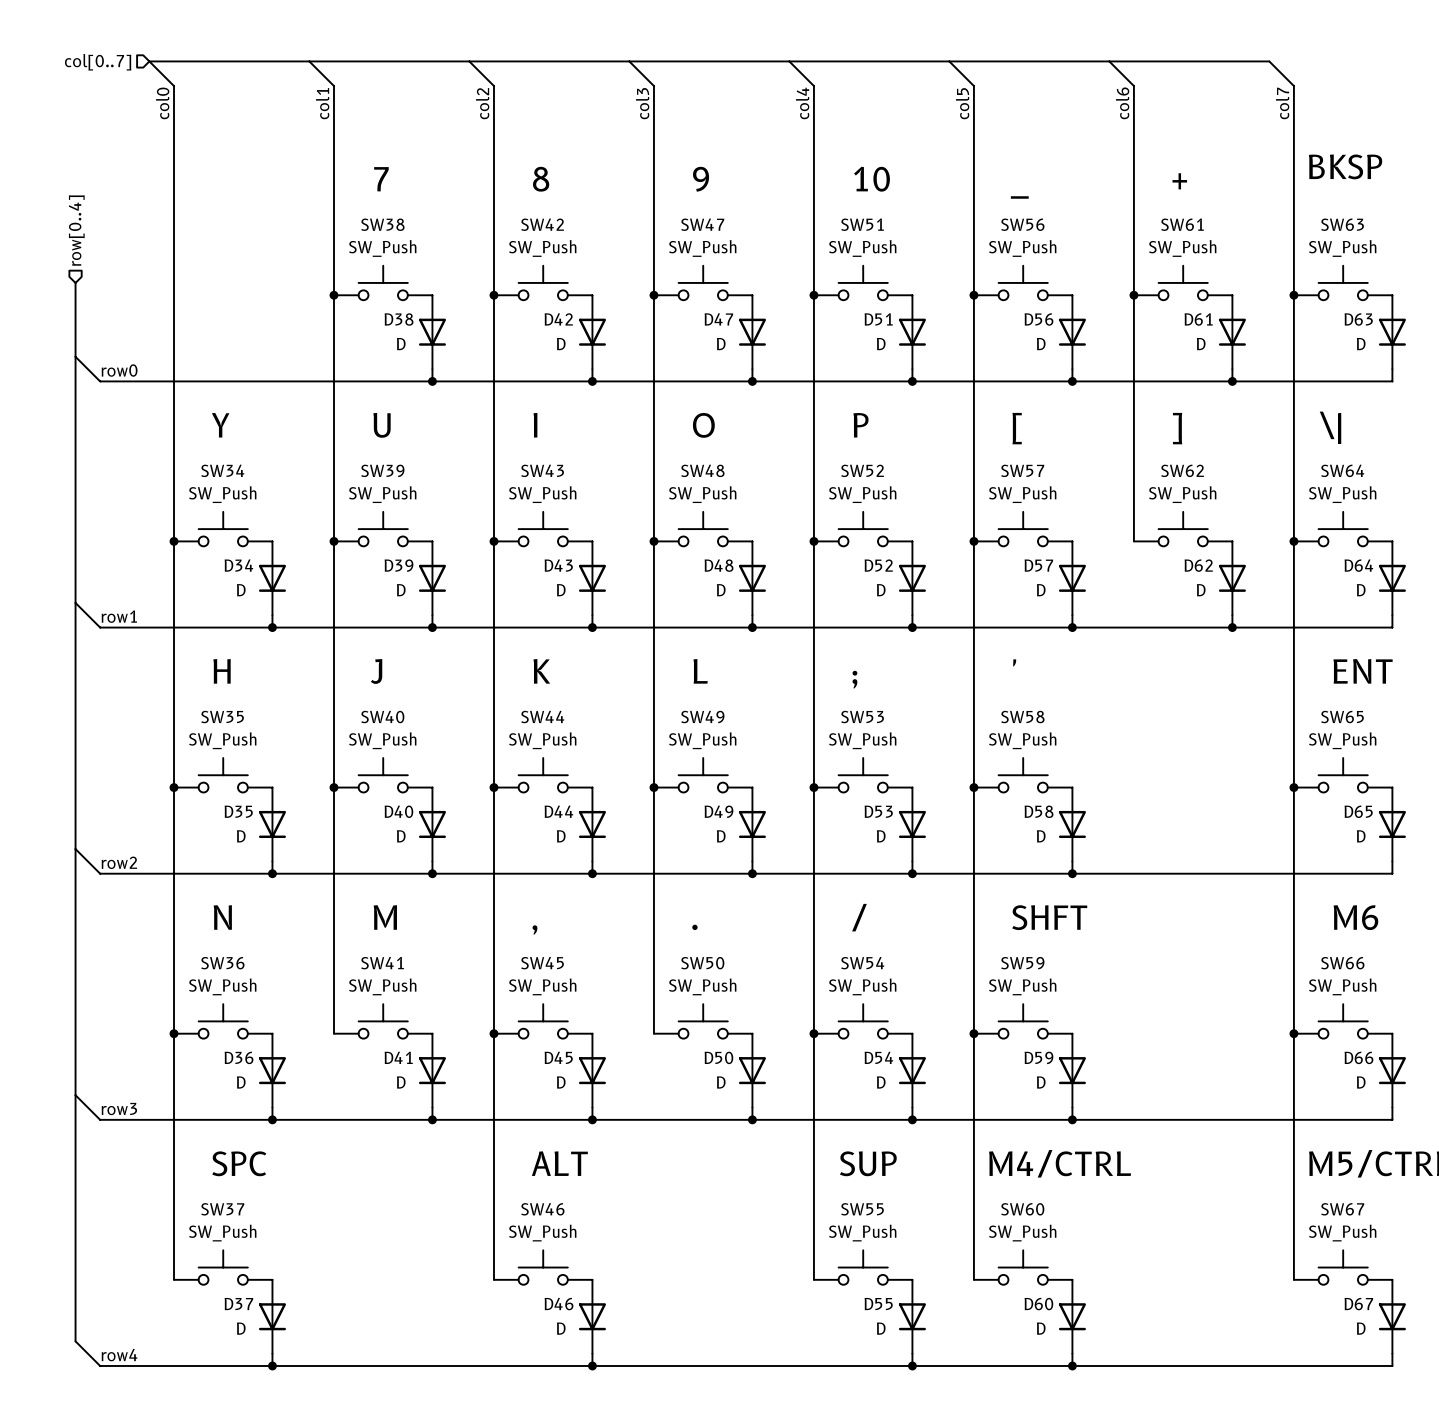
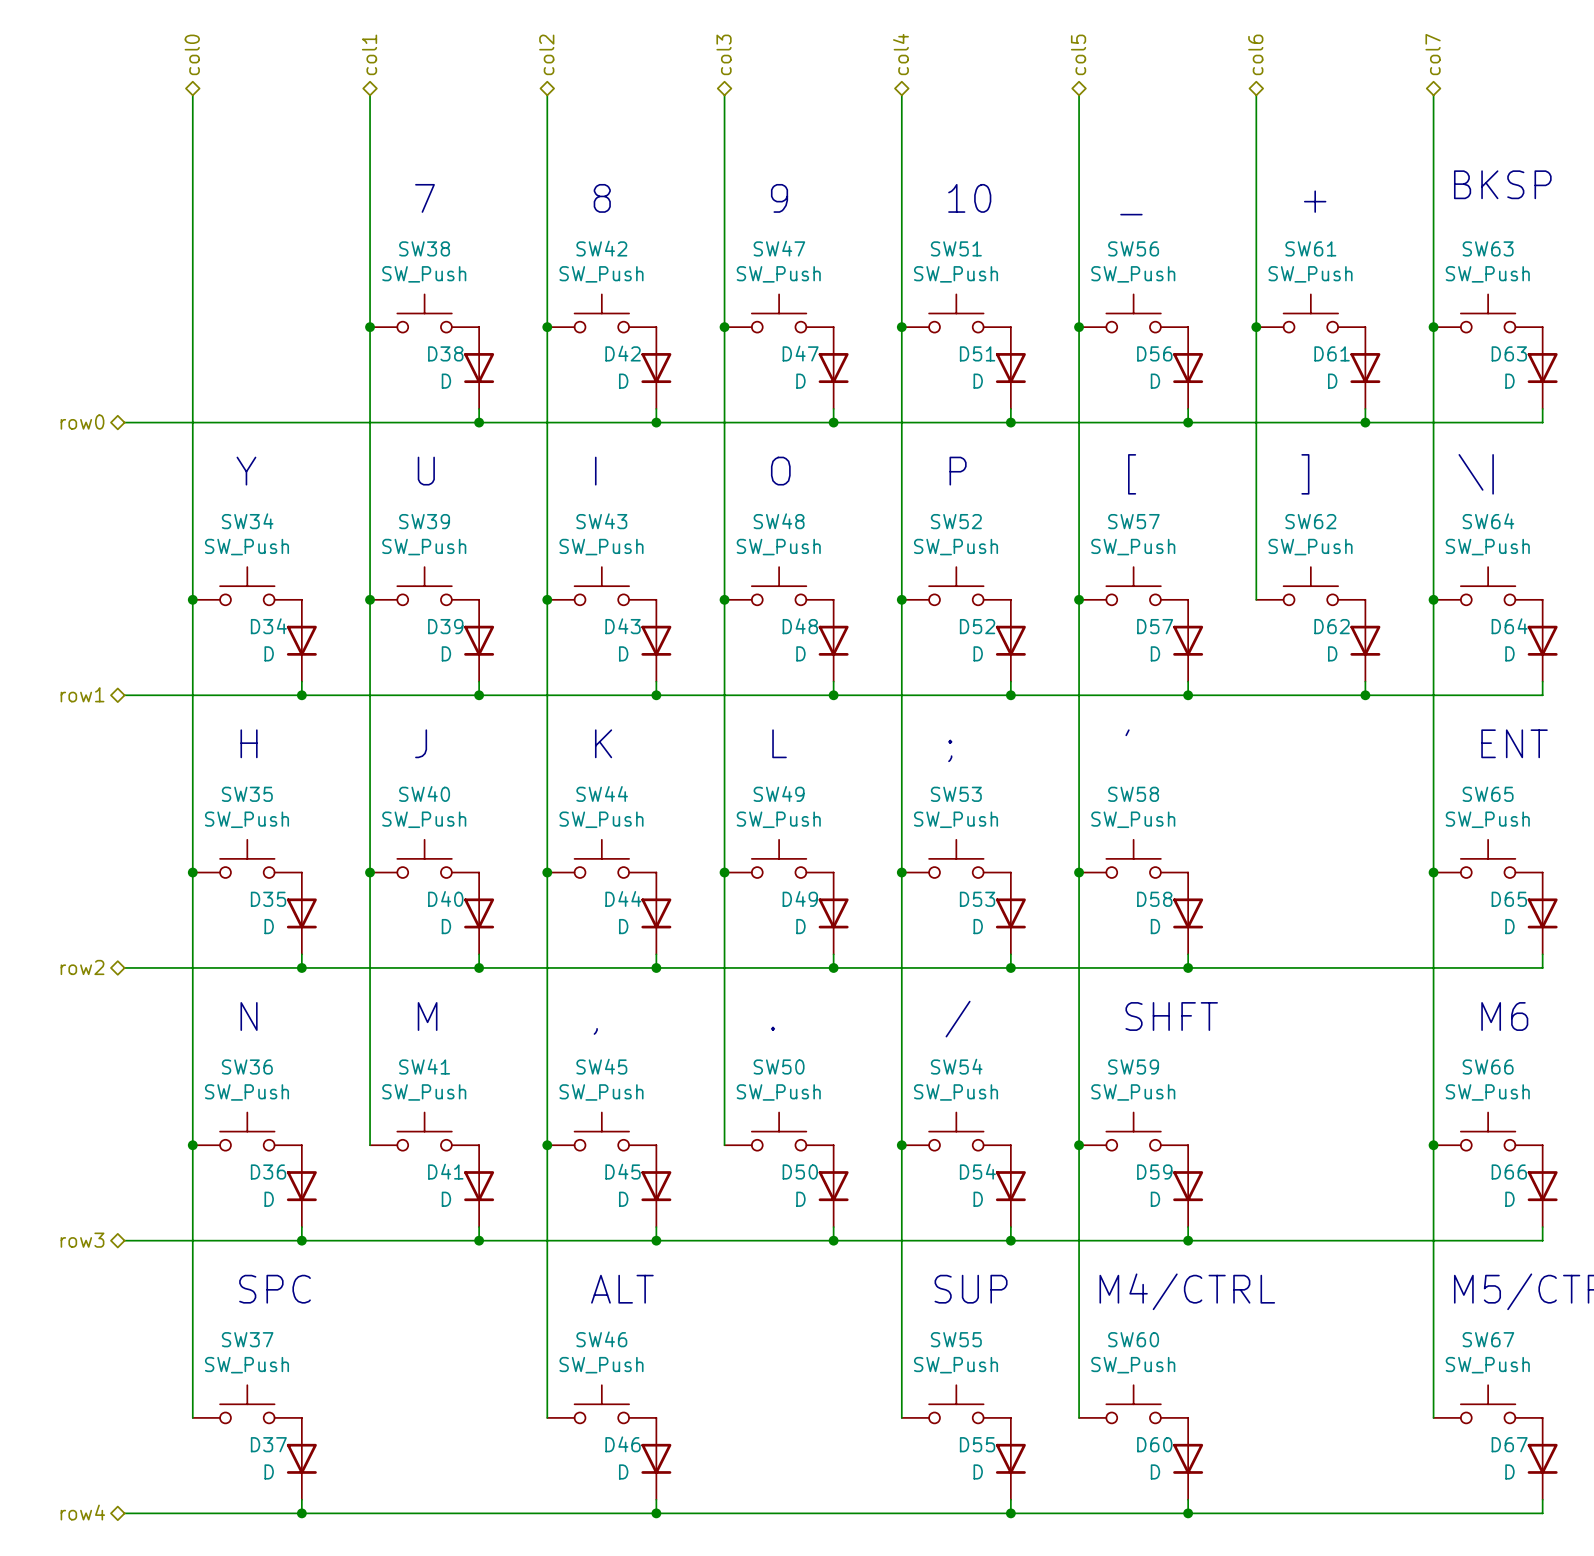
hierarchical label: none -> col0 (192, 54)
hierarchical label: none -> col3 (724, 54)
hierarchical label: none -> col4 (900, 54)
hierarchical label: none -> col6 (1255, 54)
hierarchical label: none -> col7 (1433, 54)
hierarchical label: none -> col1 (369, 54)
hierarchical label: none -> col2 (546, 54)
hierarchical label: none -> col5 (1078, 54)
wire: (149, 61) (174, 86) -> none
bus: (149, 61) (1269, 61) -> none
wire: (309, 61) (333, 86) -> none
wire: (469, 61) (493, 86) -> none
wire: (629, 61) (653, 86) -> none
wire: (789, 61) (813, 86) -> none
wire: (949, 61) (973, 86) -> none
wire: (1109, 61) (1133, 86) -> none
wire: (1269, 61) (1293, 86) -> none
hierarchical label: col[0..7] (98, 62) -> none
label: col0 (162, 103) -> none
label: col1 (322, 103) -> none
label: col2 (482, 103) -> none
label: col3 (642, 103) -> none
label: col4 (802, 103) -> none
label: col5 (962, 103) -> none
label: col6 (1122, 103) -> none
label: col7 (1282, 103) -> none
hierarchical label: row[0..4] (76, 230) -> none
bus: (75, 282) (75, 1341) -> none
wire: (75, 356) (100, 381) (112, 381) -> none
label: row0 (119, 370) -> none
hierarchical label: none -> row0 (82, 422)
wire: (75, 602) (100, 627) (112, 627) -> none
label: row1 (119, 616) -> none
hierarchical label: none -> row1 (82, 694)
wire: (75, 849) (100, 873) (112, 873) -> none
label: row2 (119, 862) -> none
hierarchical label: none -> row2 (82, 967)
wire: (75, 1095) (100, 1119) (112, 1119) -> none
label: row3 (119, 1109) -> none
hierarchical label: none -> row3 (82, 1240)
wire: (75, 1341) (100, 1365) (112, 1365) -> none
label: row4 (119, 1355) -> none
hierarchical label: none -> row4 (82, 1512)

